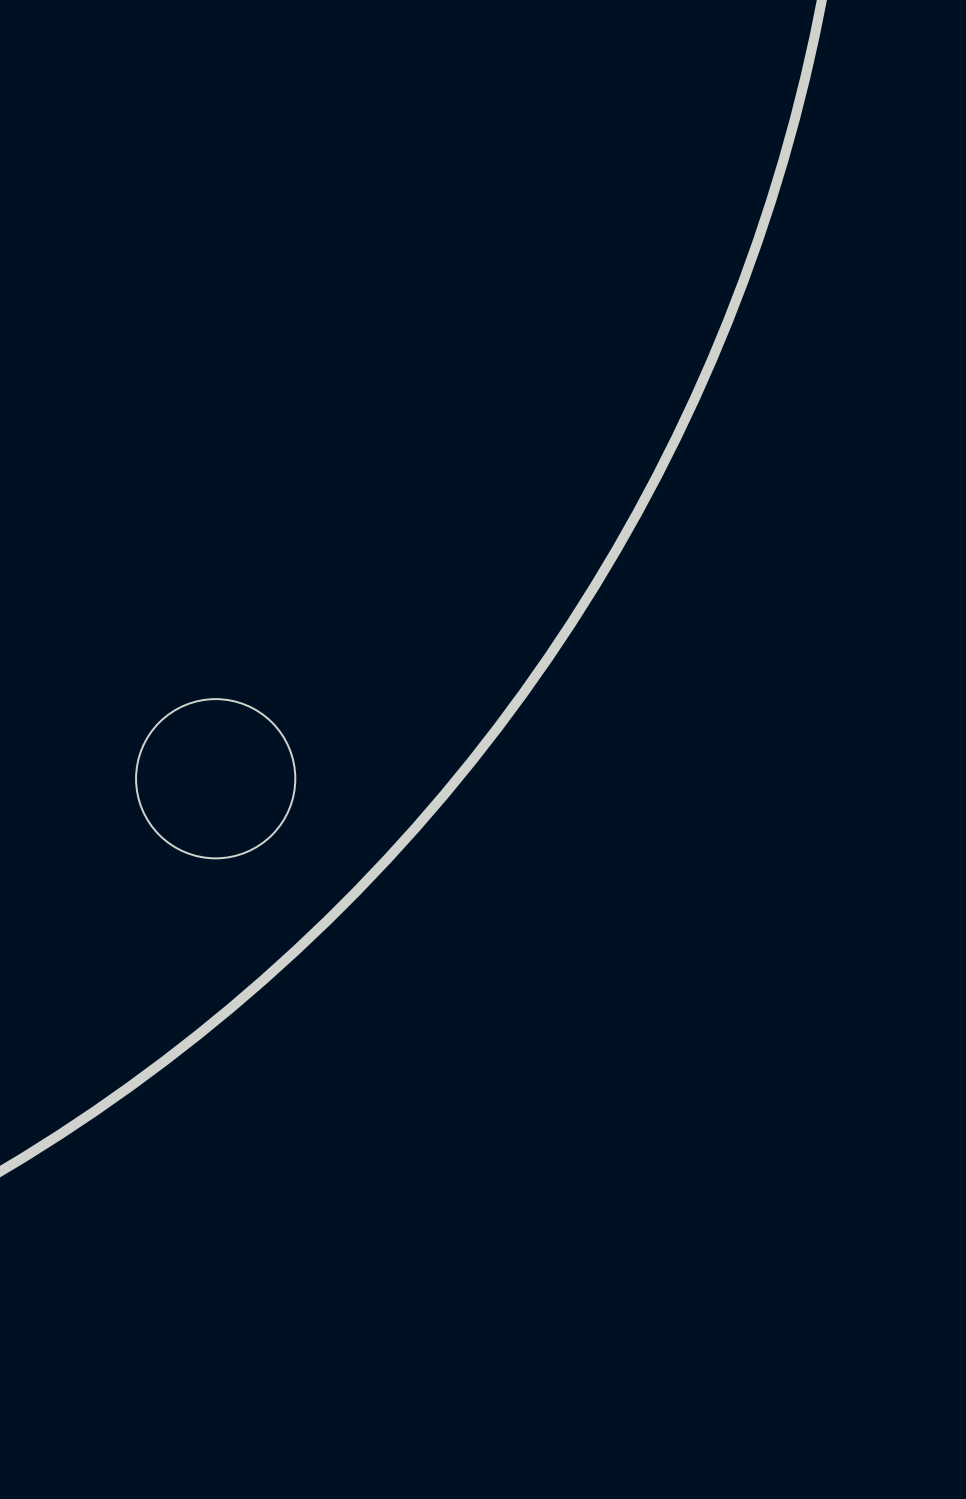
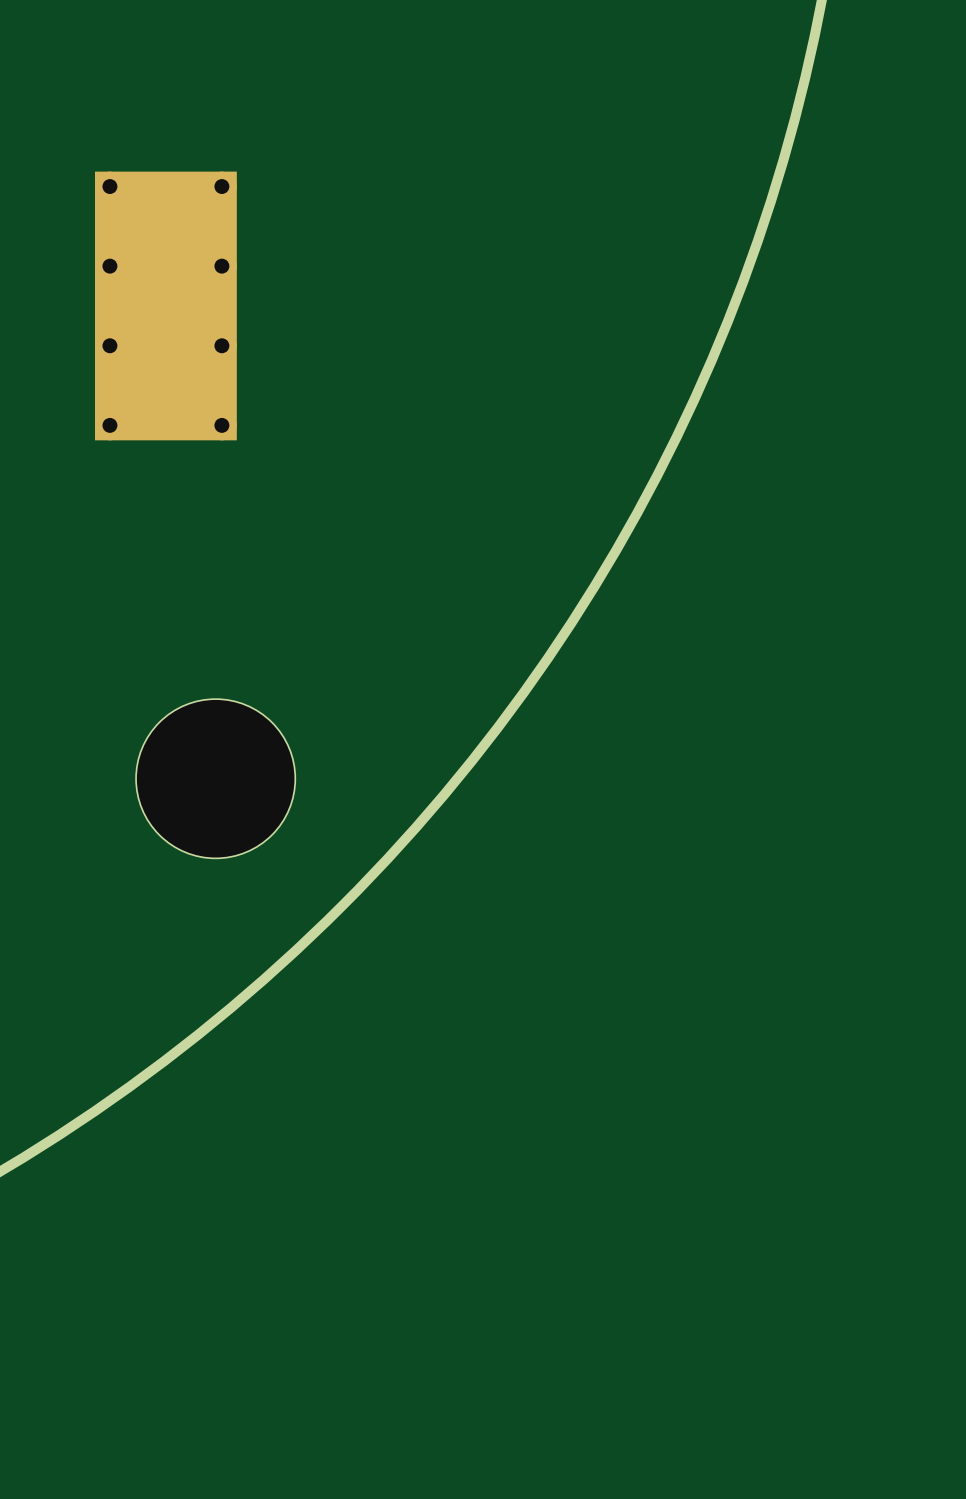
part: none -> (165, 305)

